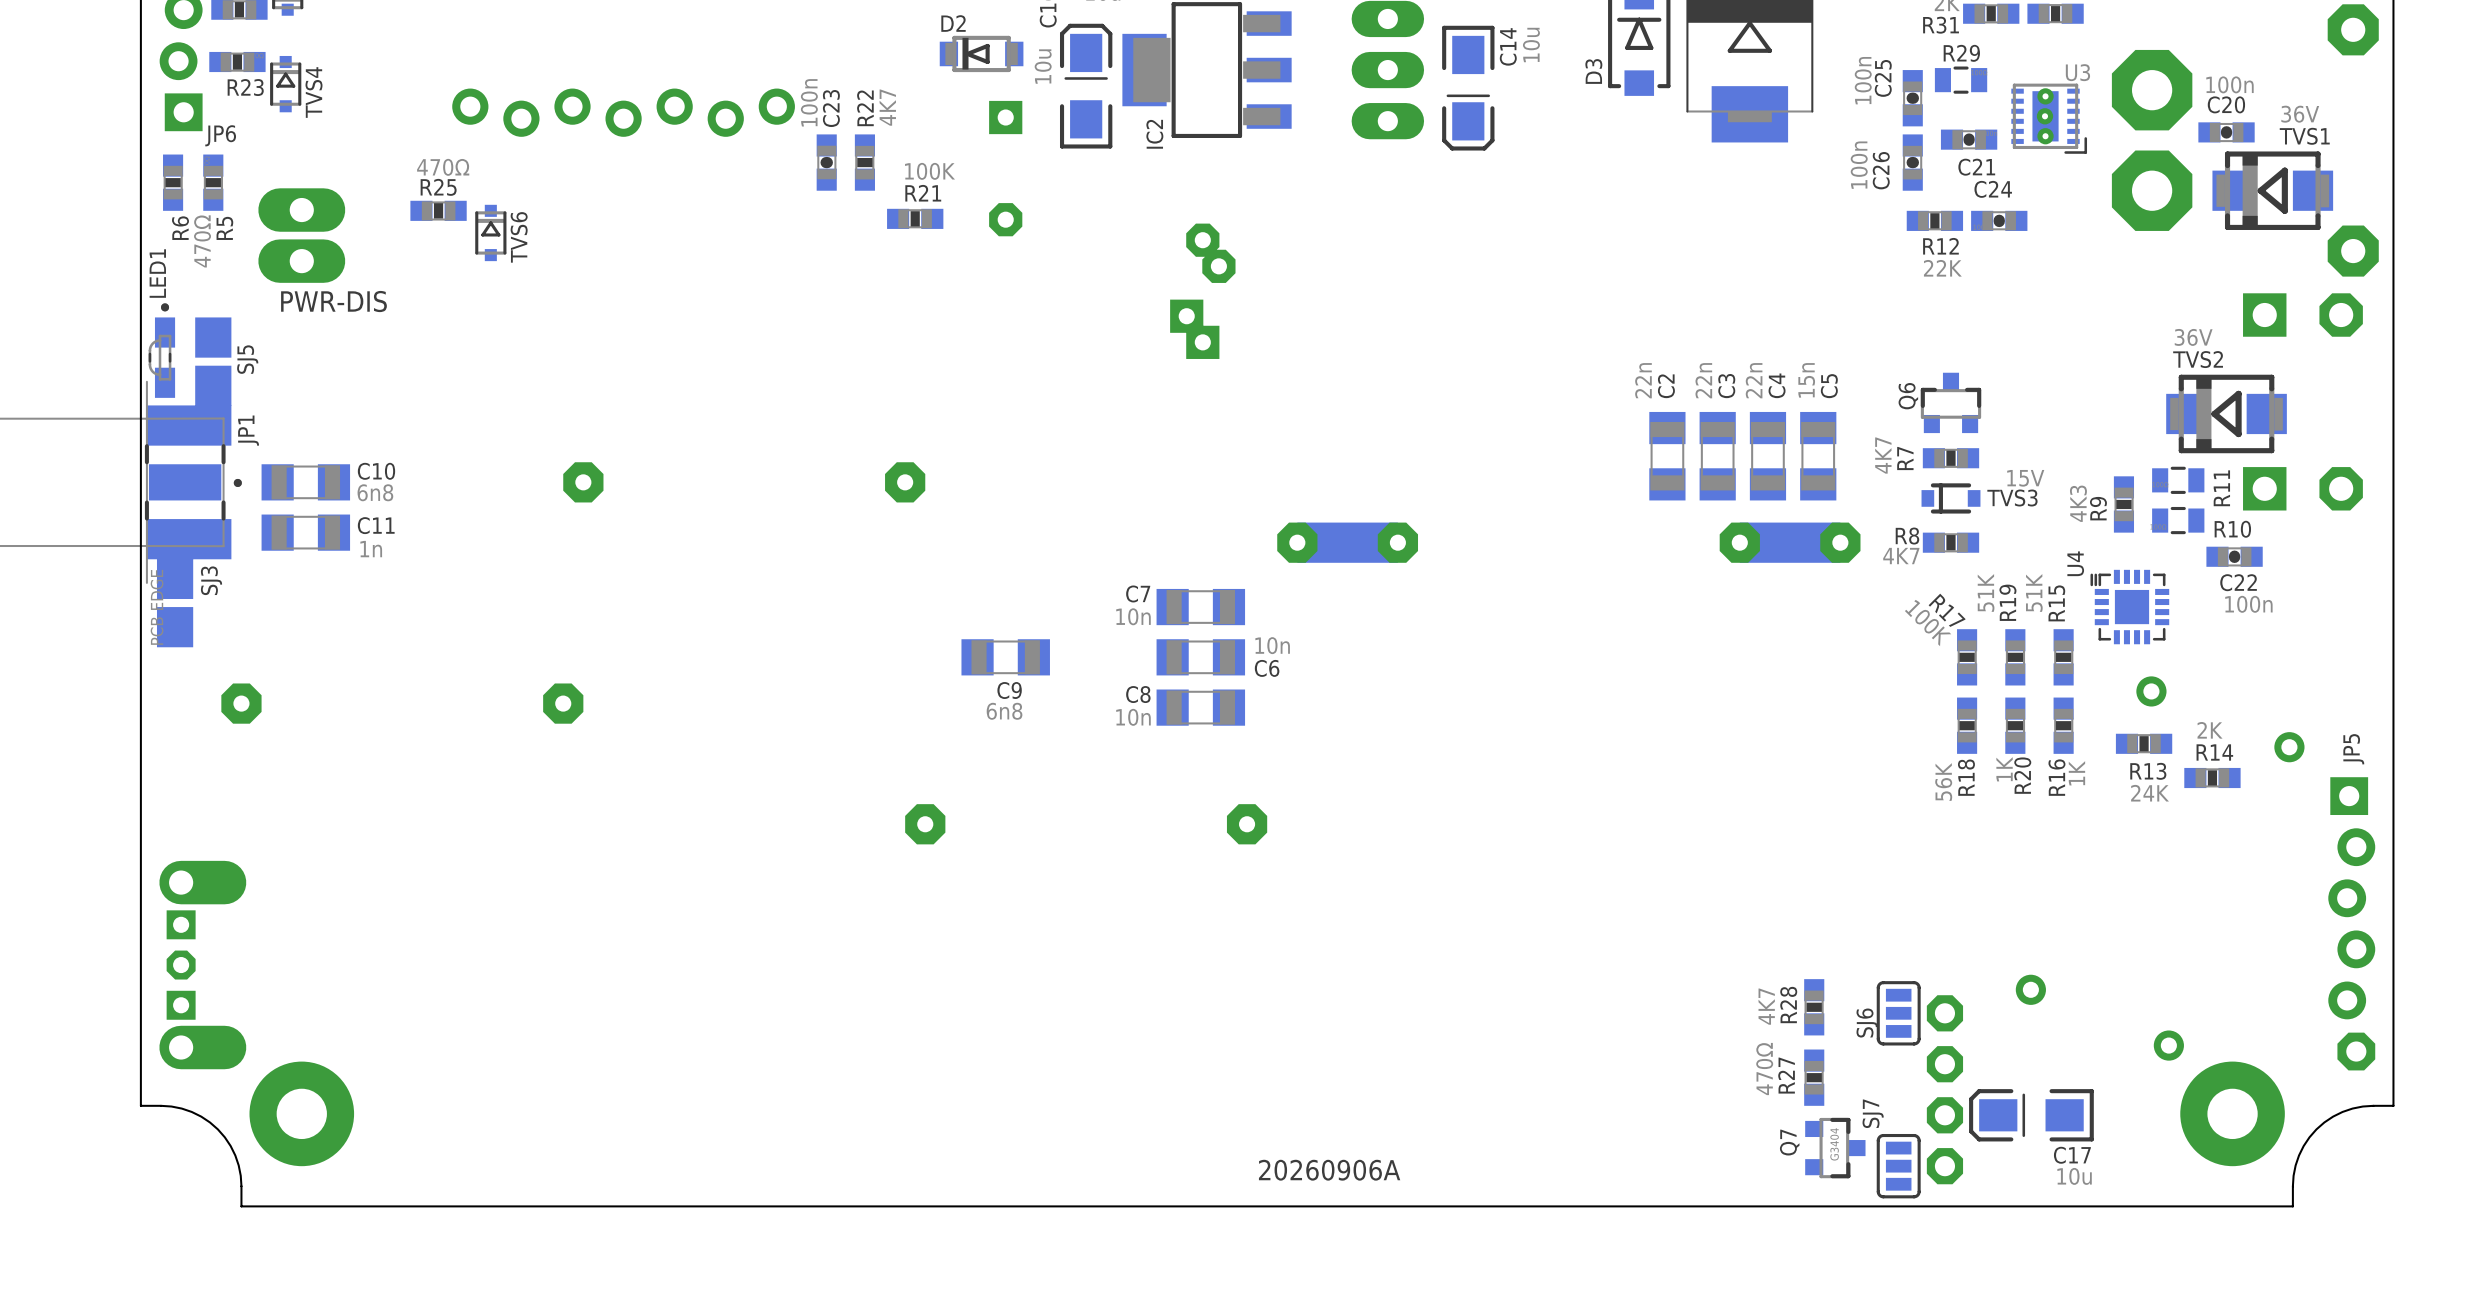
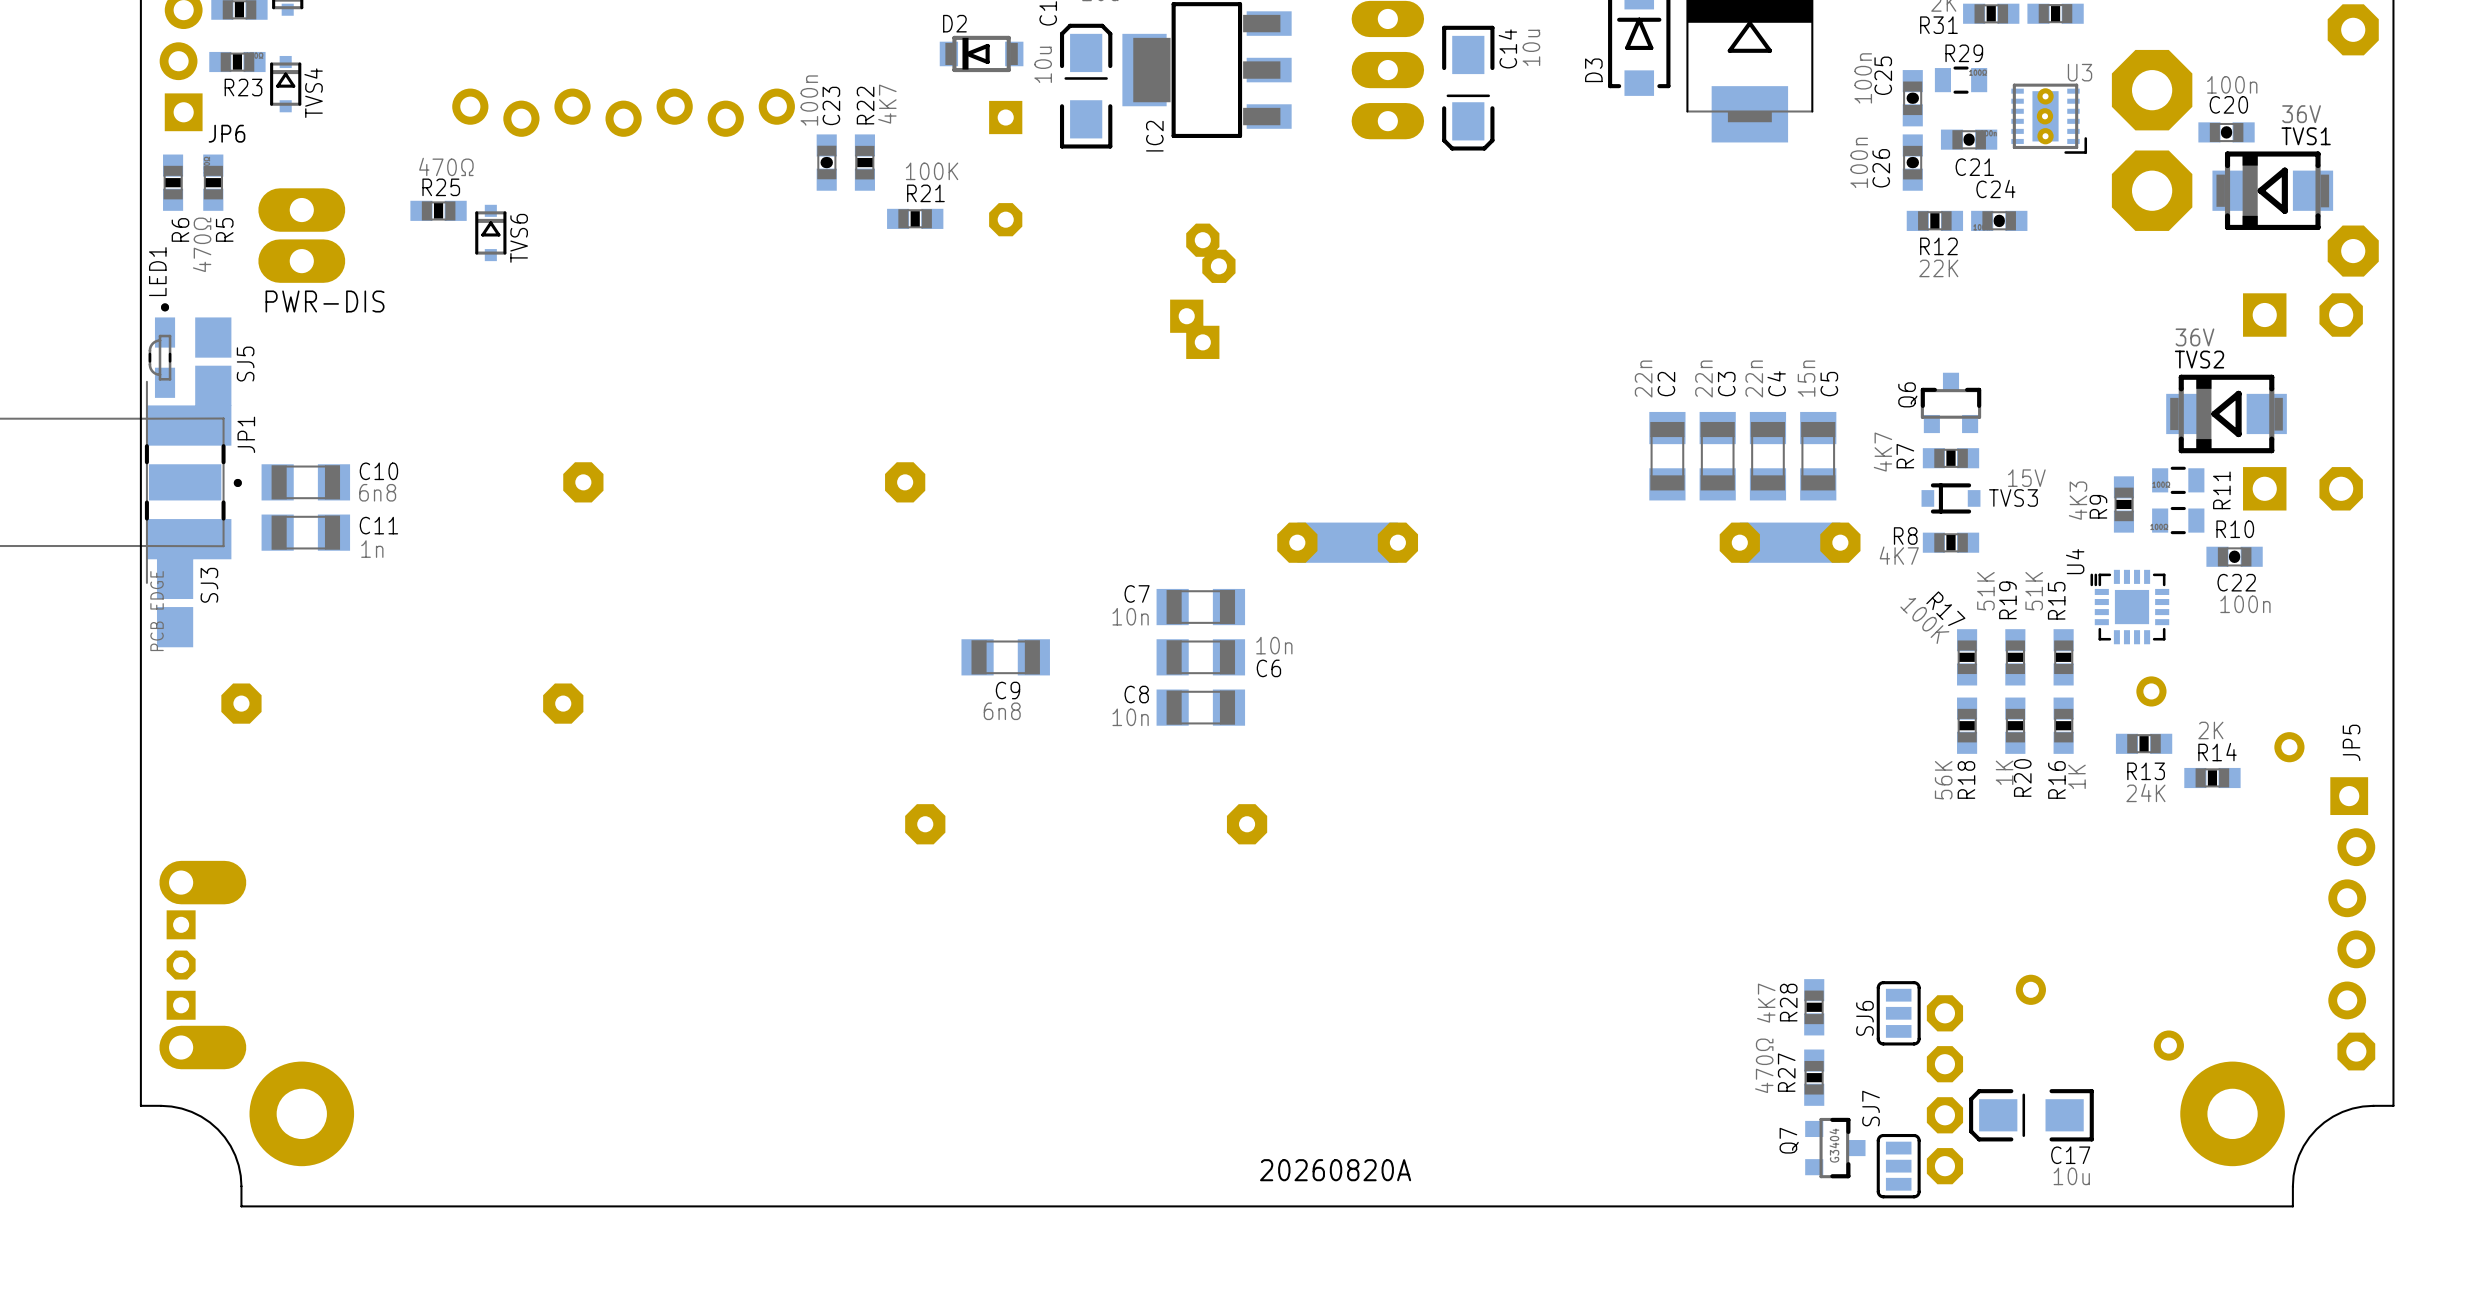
drawing shape: [1258, 1159, 1401, 1181] -> [1260, 1159, 1412, 1182]

